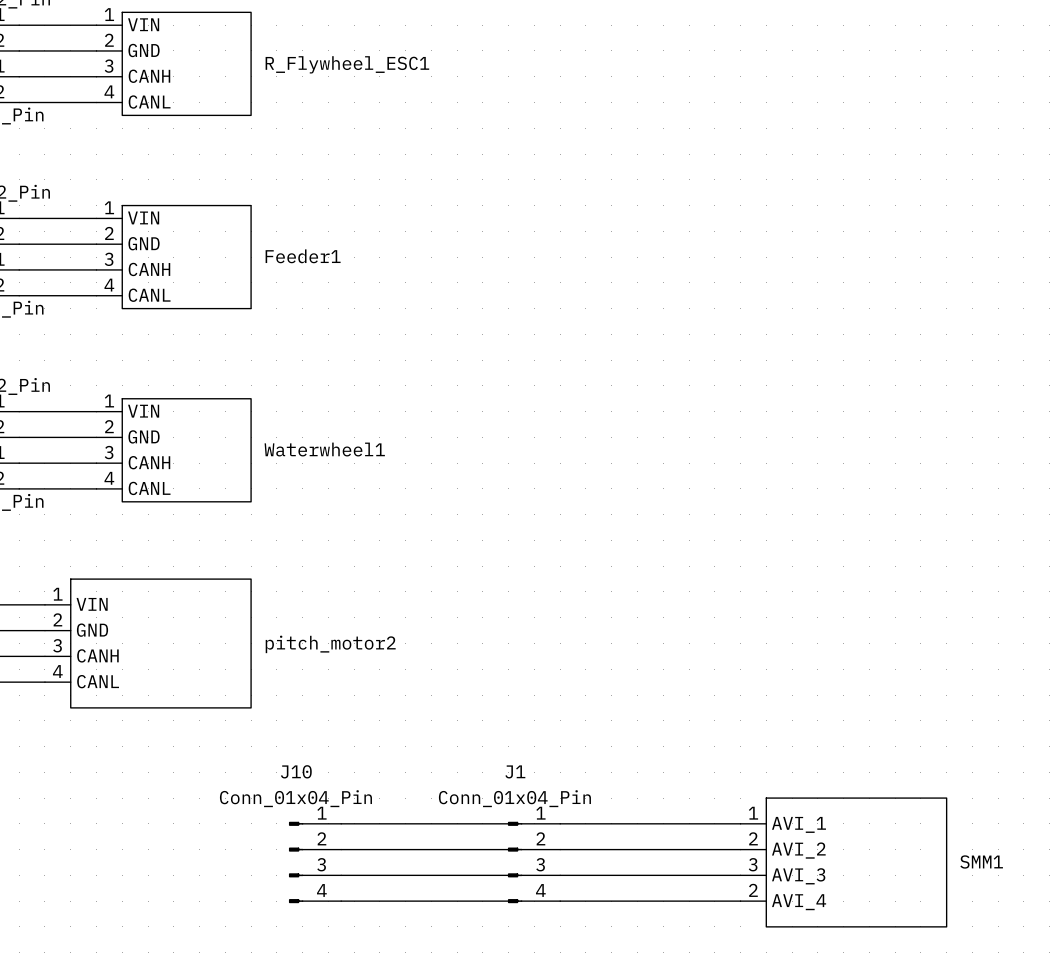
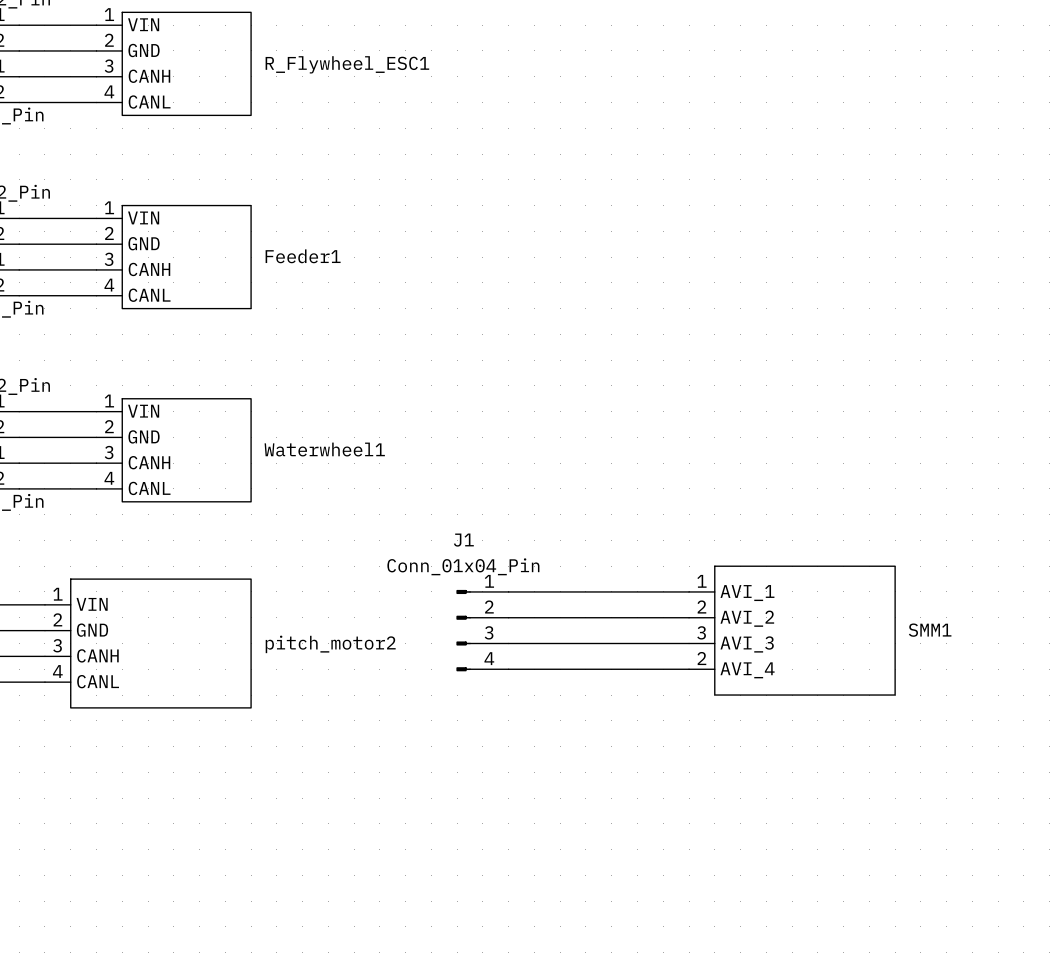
wire: (341, 823) (508, 823) -> none
wire: (560, 823) (740, 823) -> (508, 591) (689, 591)
wire: (341, 849) (508, 849) -> none
wire: (560, 849) (740, 849) -> (508, 617) (689, 617)
J10: Conn_01x04_Pin (315, 862) -> none
J1 position: (534, 862) -> (482, 630)
SMM1 position: (843, 862) -> (792, 630)
wire: (341, 875) (508, 875) -> none
wire: (560, 875) (740, 875) -> (508, 643) (689, 643)
wire: (341, 901) (508, 901) -> none
wire: (560, 901) (740, 901) -> (508, 669) (689, 669)

